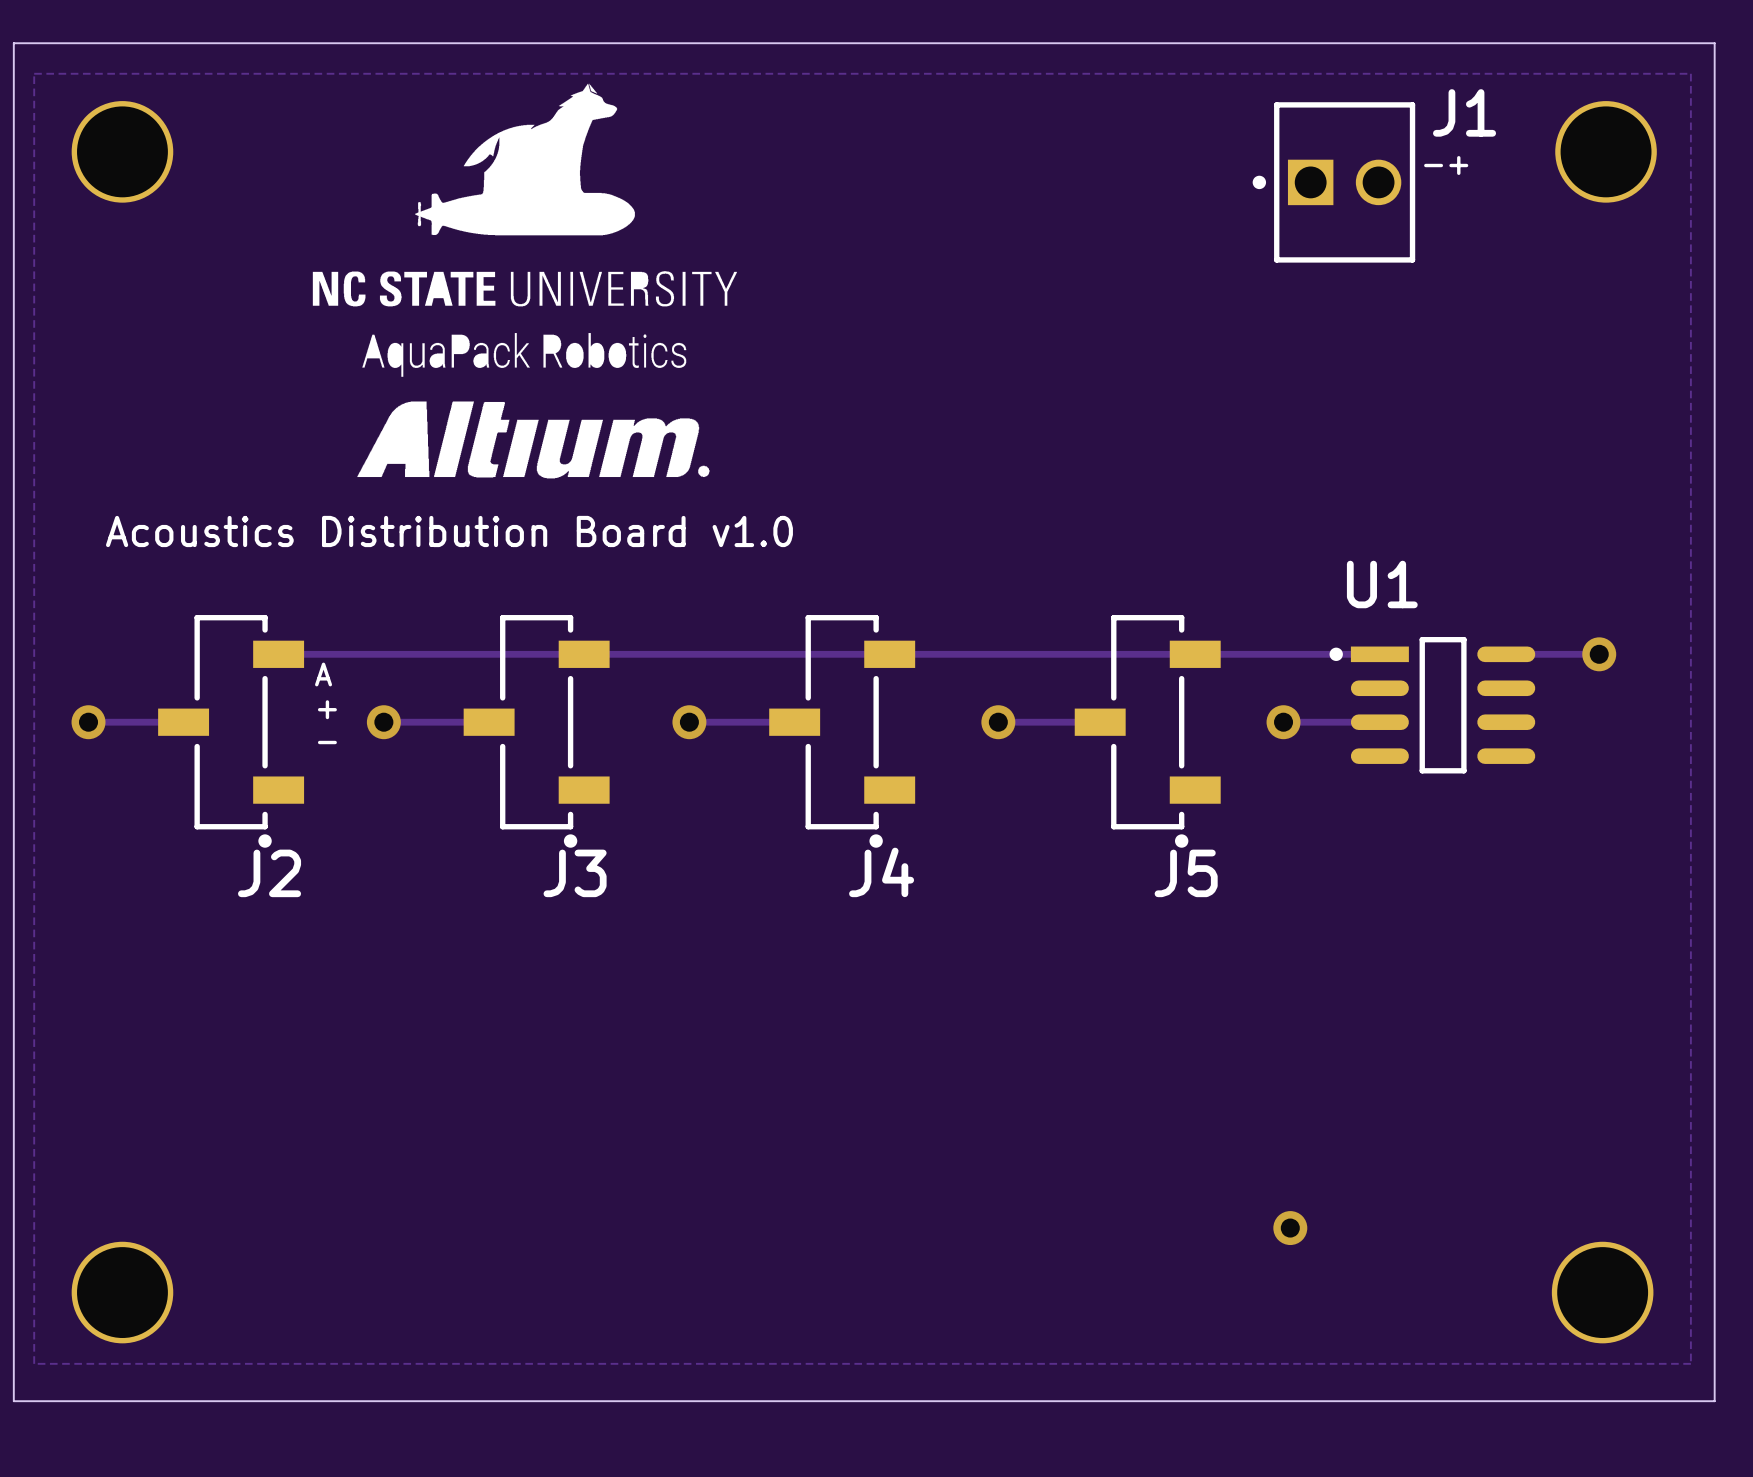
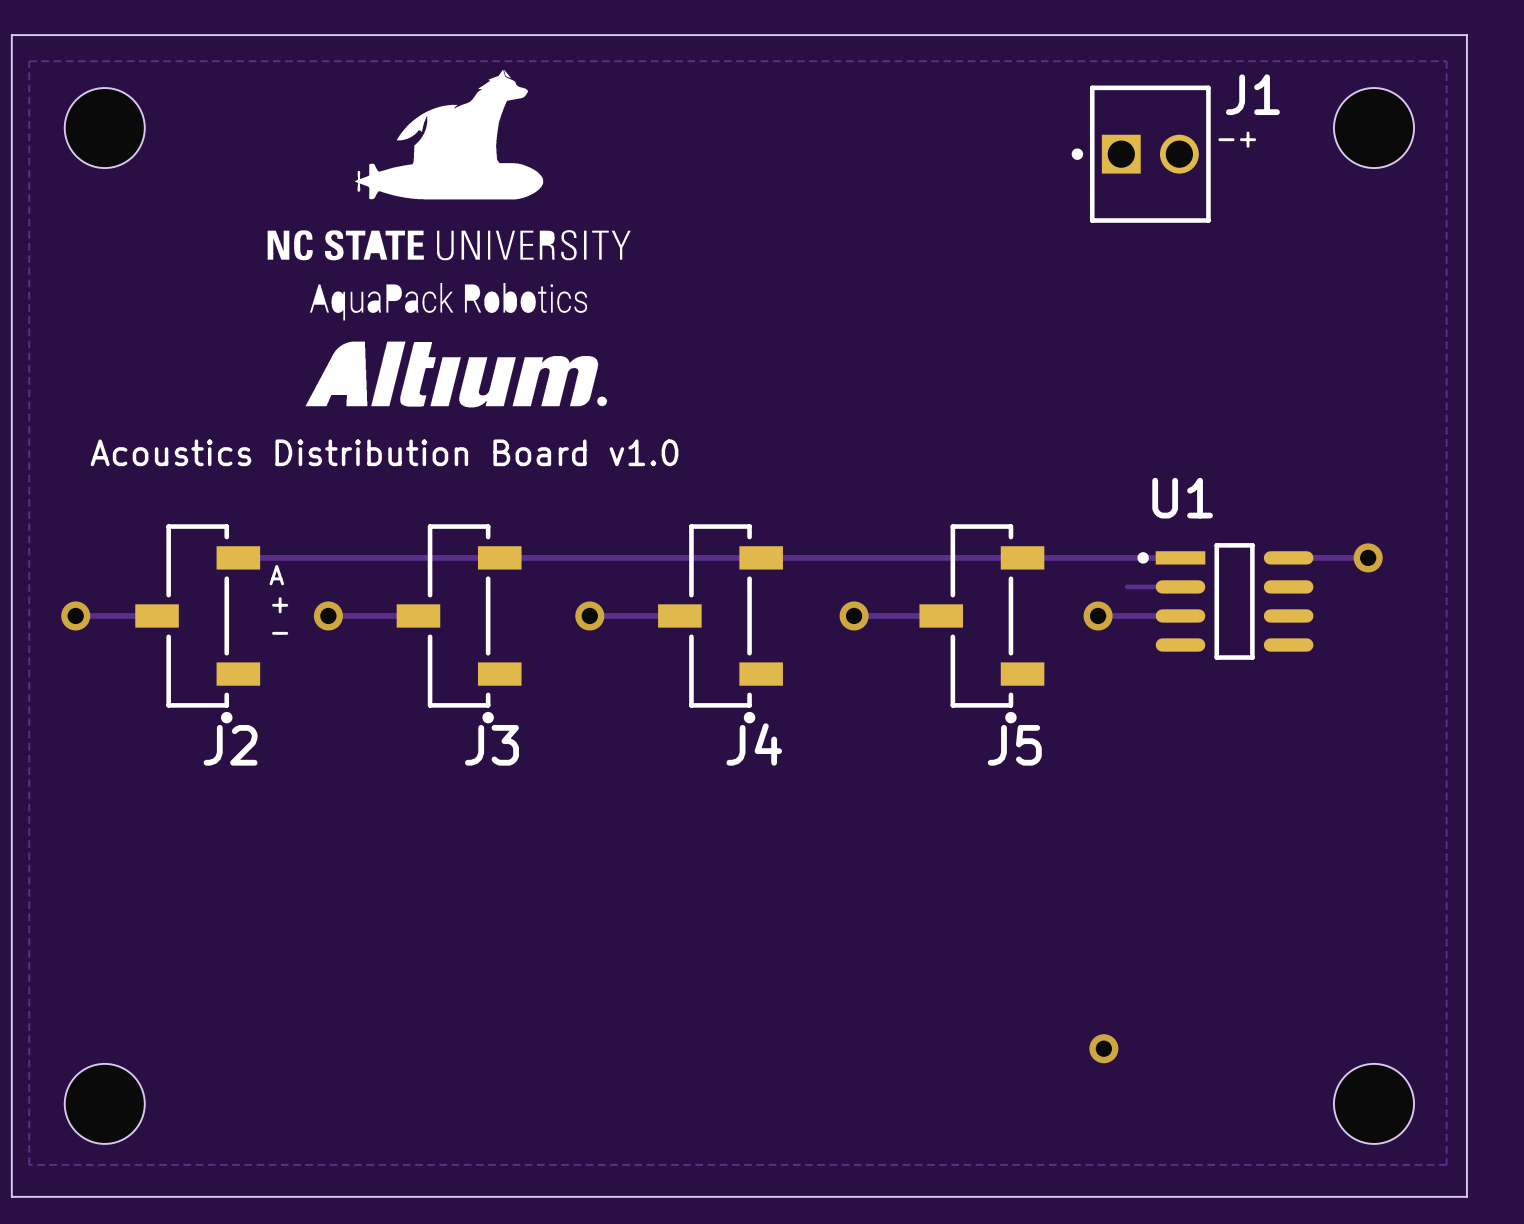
part footprint: [71, 101, 174, 203] -> [64, 88, 145, 169]
part footprint: [1555, 101, 1657, 203] -> [1333, 88, 1415, 169]
track: none -> (1127, 586) (1180, 586)
part footprint: [71, 1241, 174, 1344] -> [64, 1063, 145, 1144]
part footprint: [1551, 1241, 1654, 1344] -> [1333, 1063, 1415, 1144]

